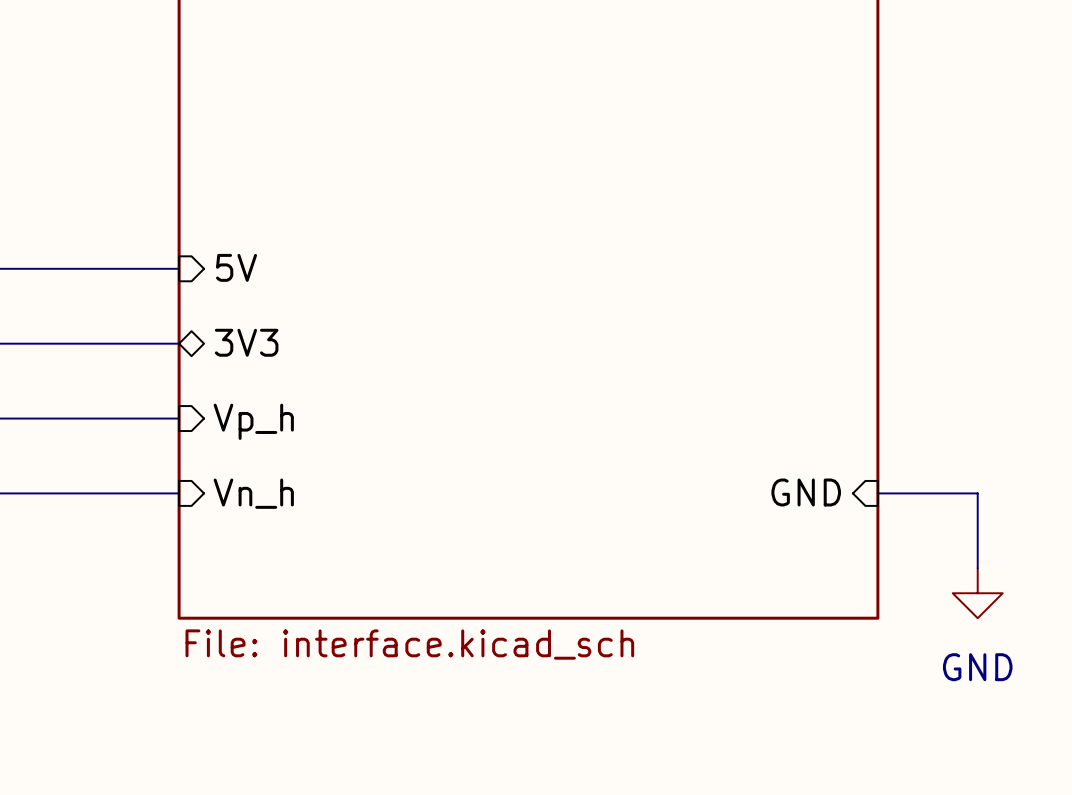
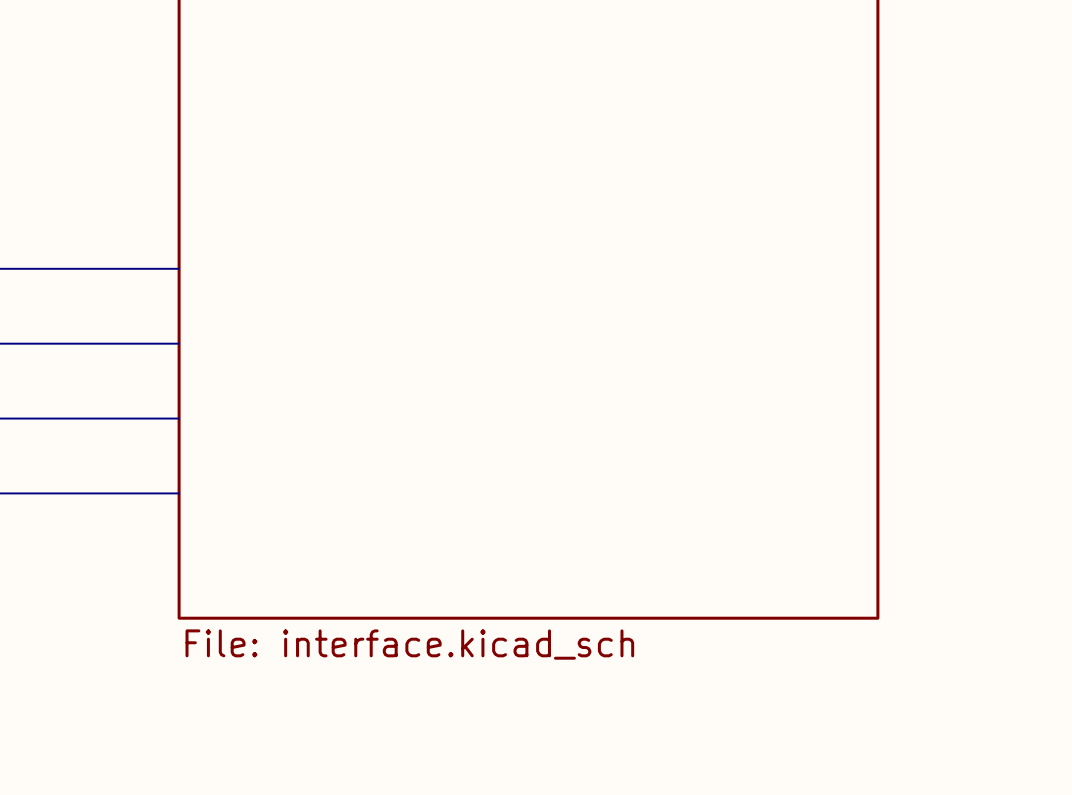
sheet pin: 5V (236, 267) -> none
sheet pin: 3V3 (246, 342) -> none
sheet pin: Vp_h (253, 421) -> none
sheet pin: GND (806, 492) -> none
sheet pin: Vn_h (253, 493) -> none
wire: (877, 493) (977, 493) (977, 568) -> none
power symbol: GND (977, 593) -> none

